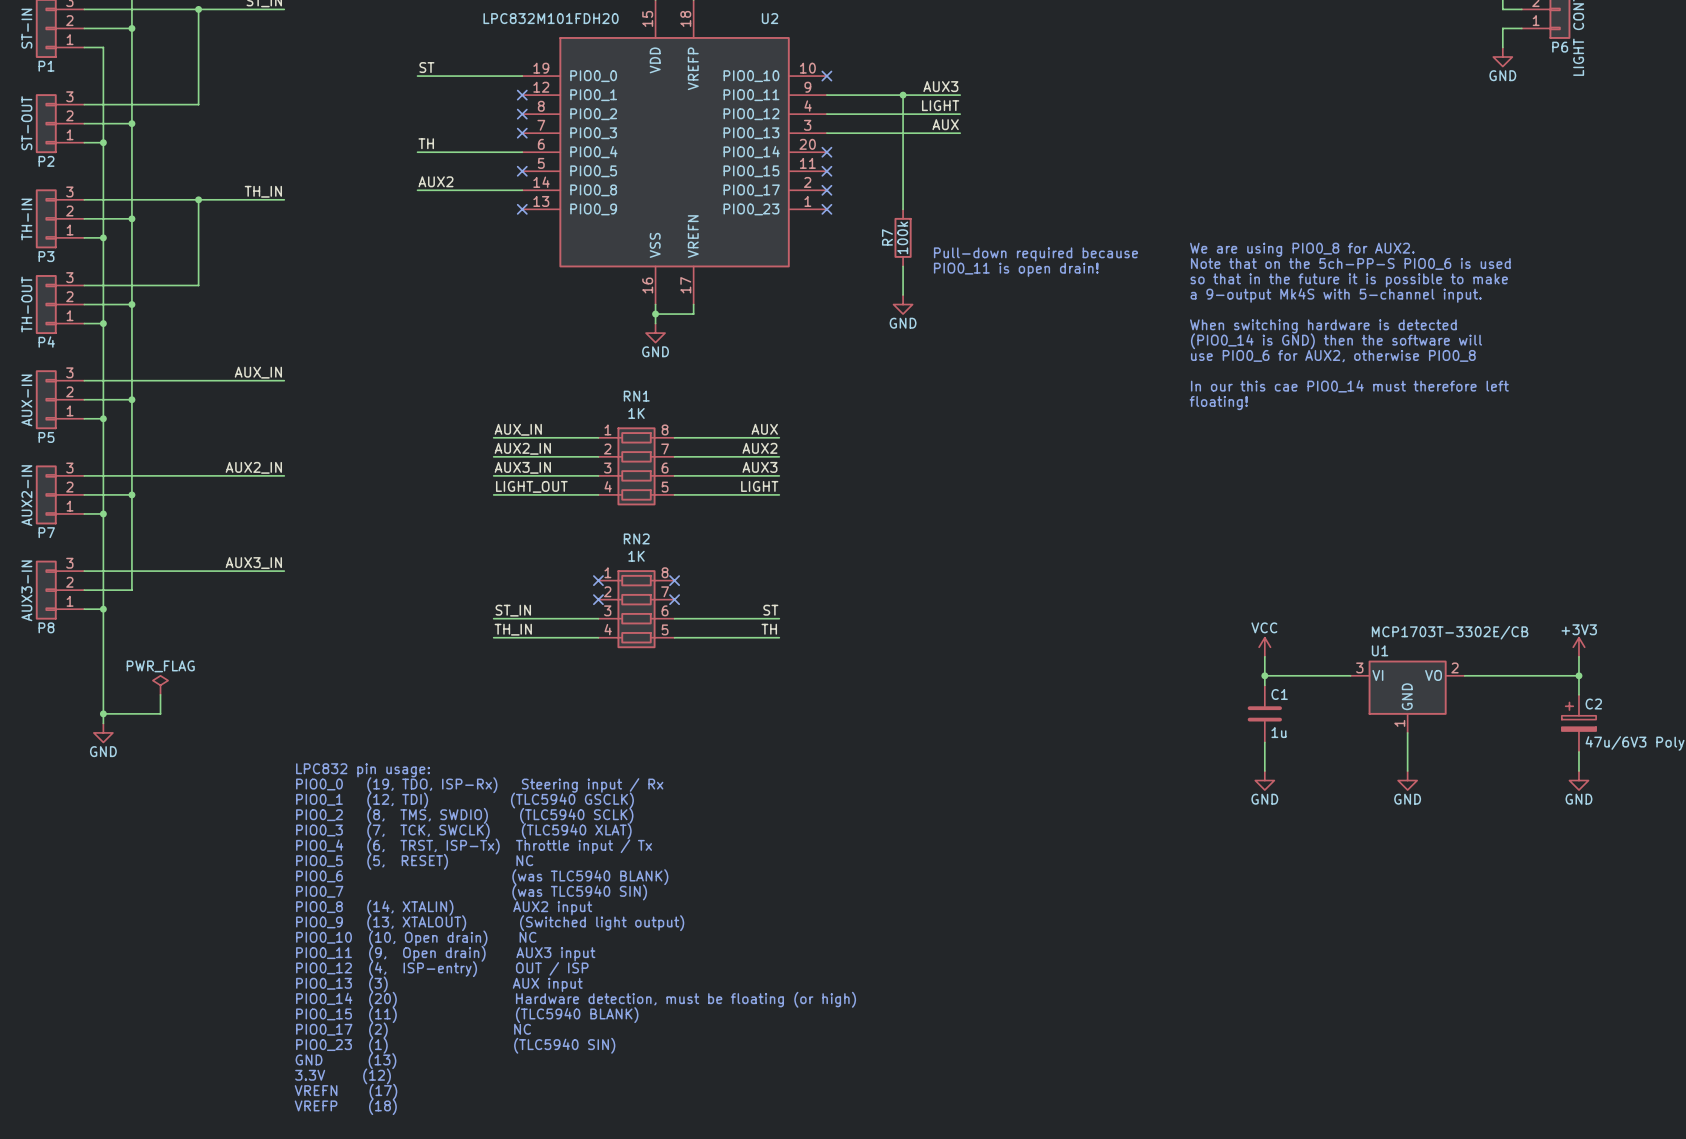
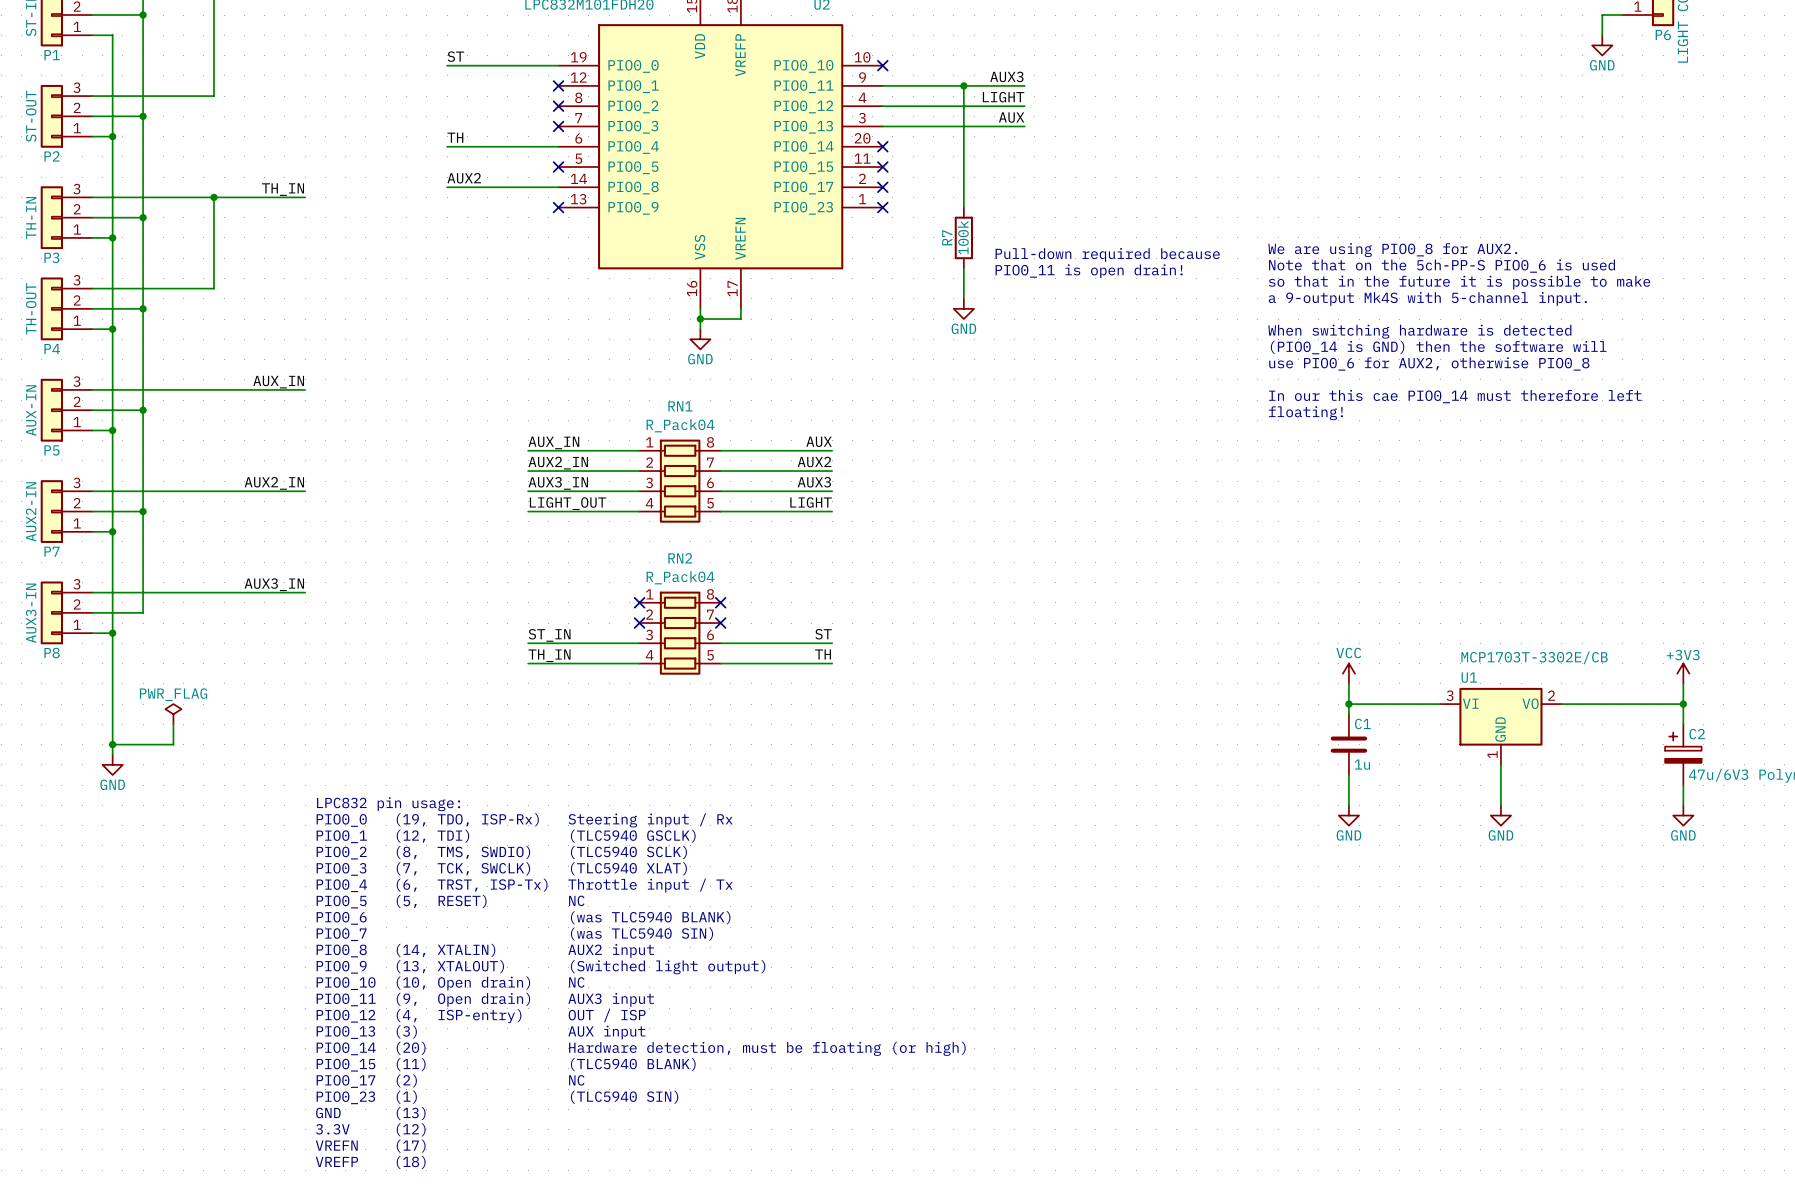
RN1 value: 1K (636, 413) -> R_Pack04 (680, 425)
RN2 value: 1K (636, 556) -> R_Pack04 (680, 577)

